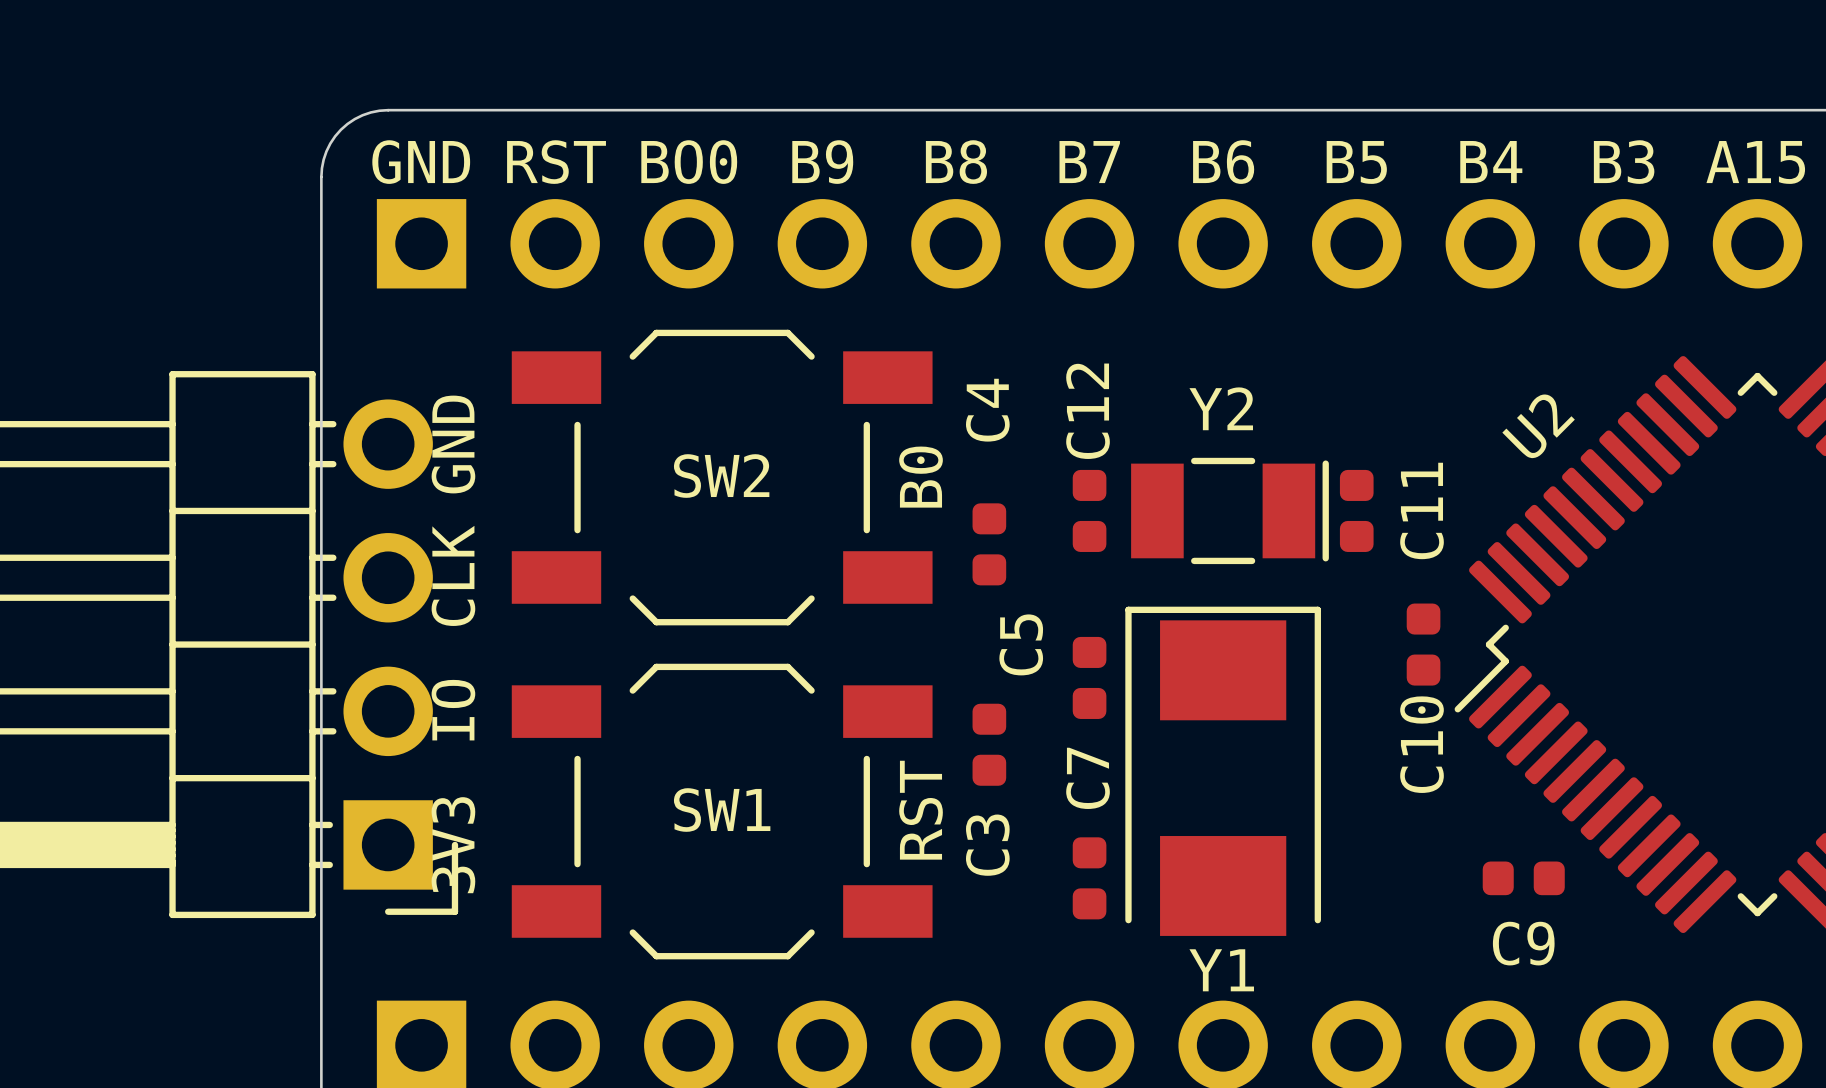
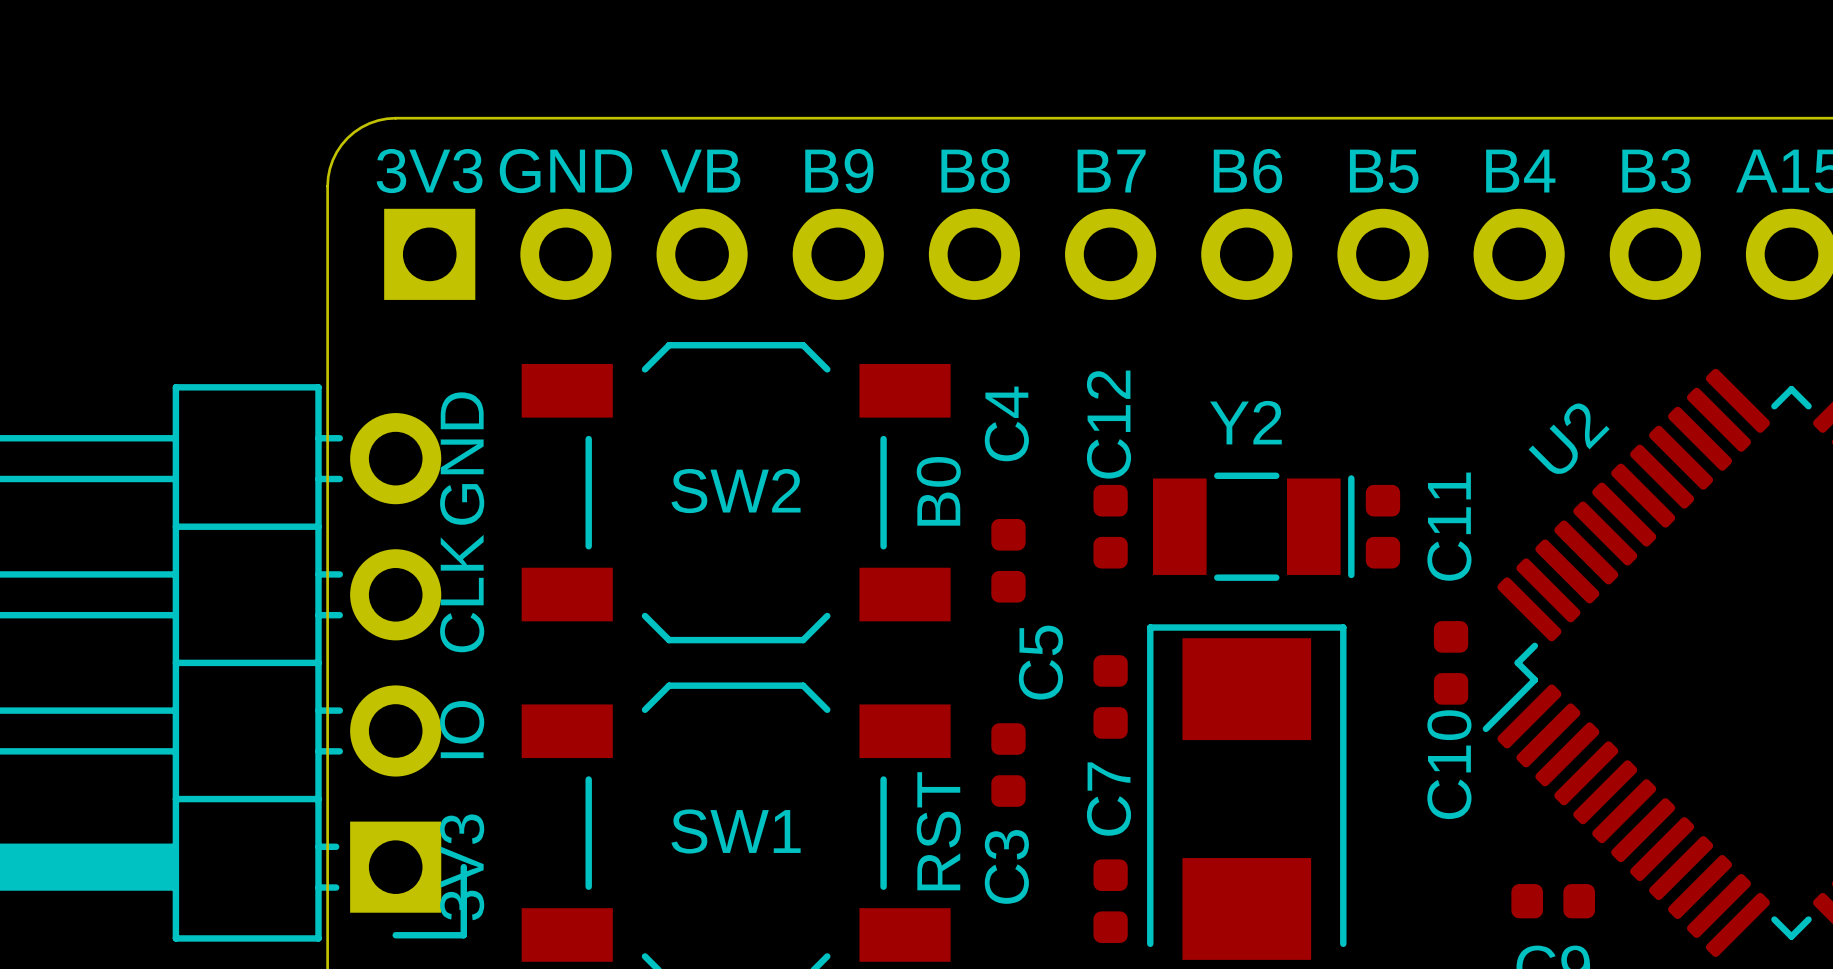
text: GND (421, 162) -> 3V3 (429, 171)
text: RST (556, 162) -> GND (565, 171)
text: BO0 (689, 162) -> VB (700, 171)

